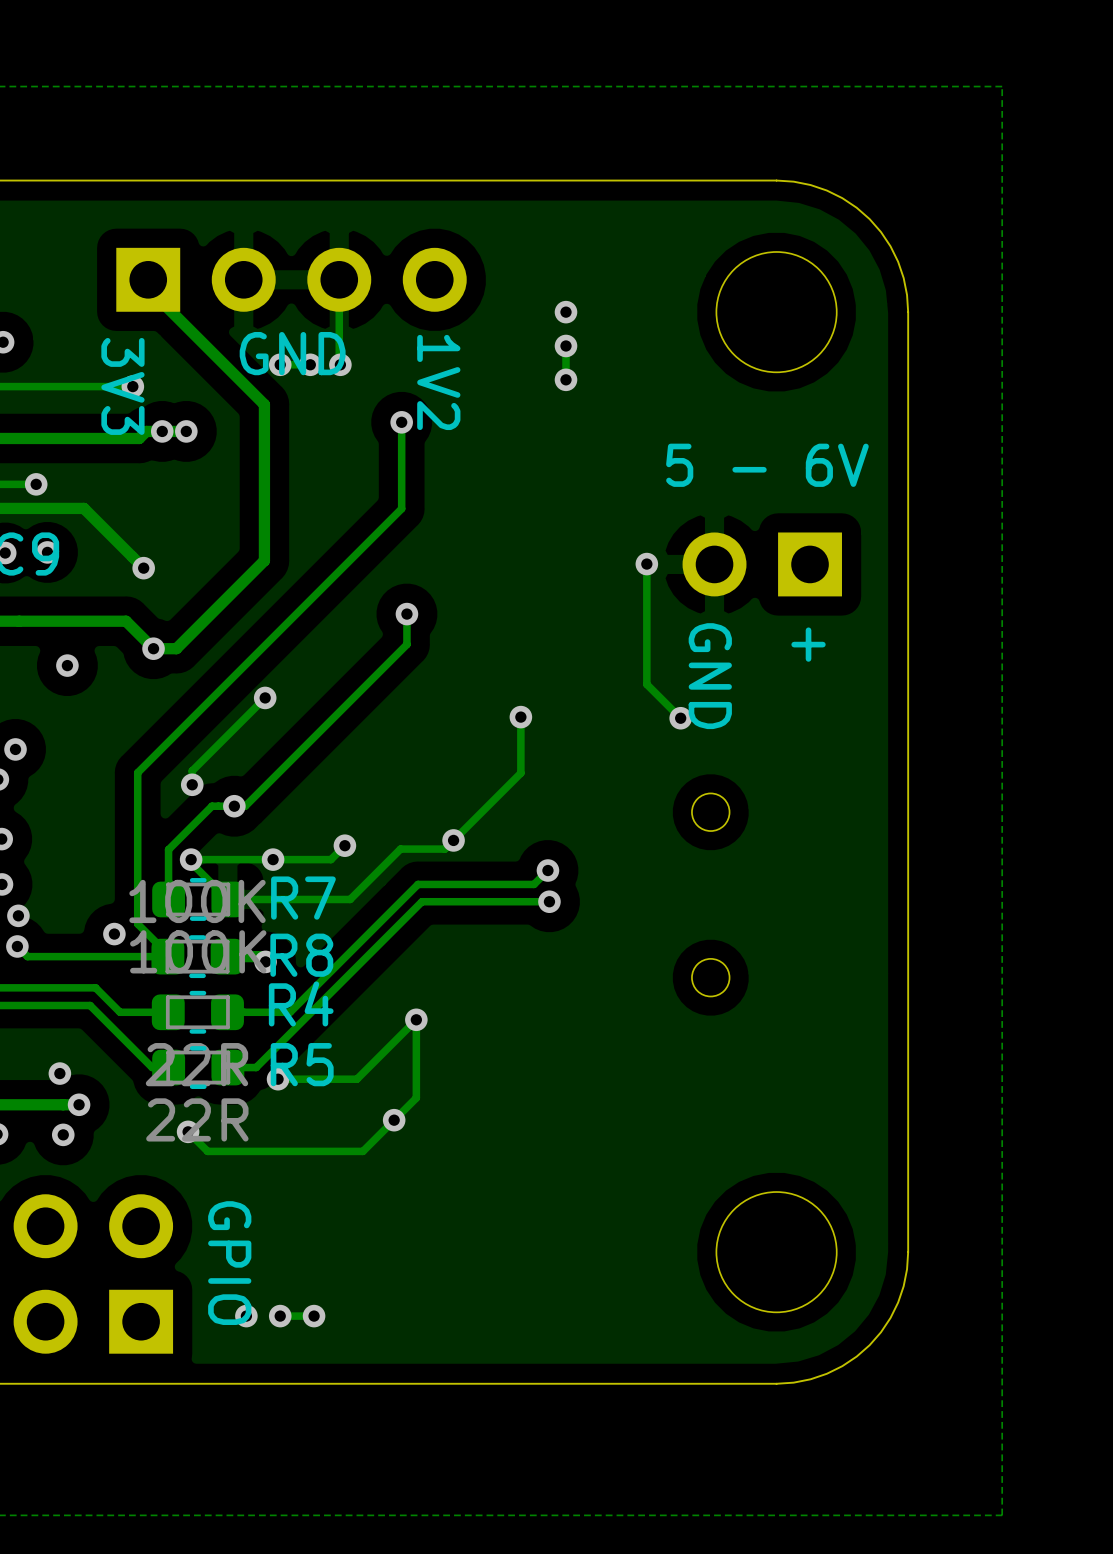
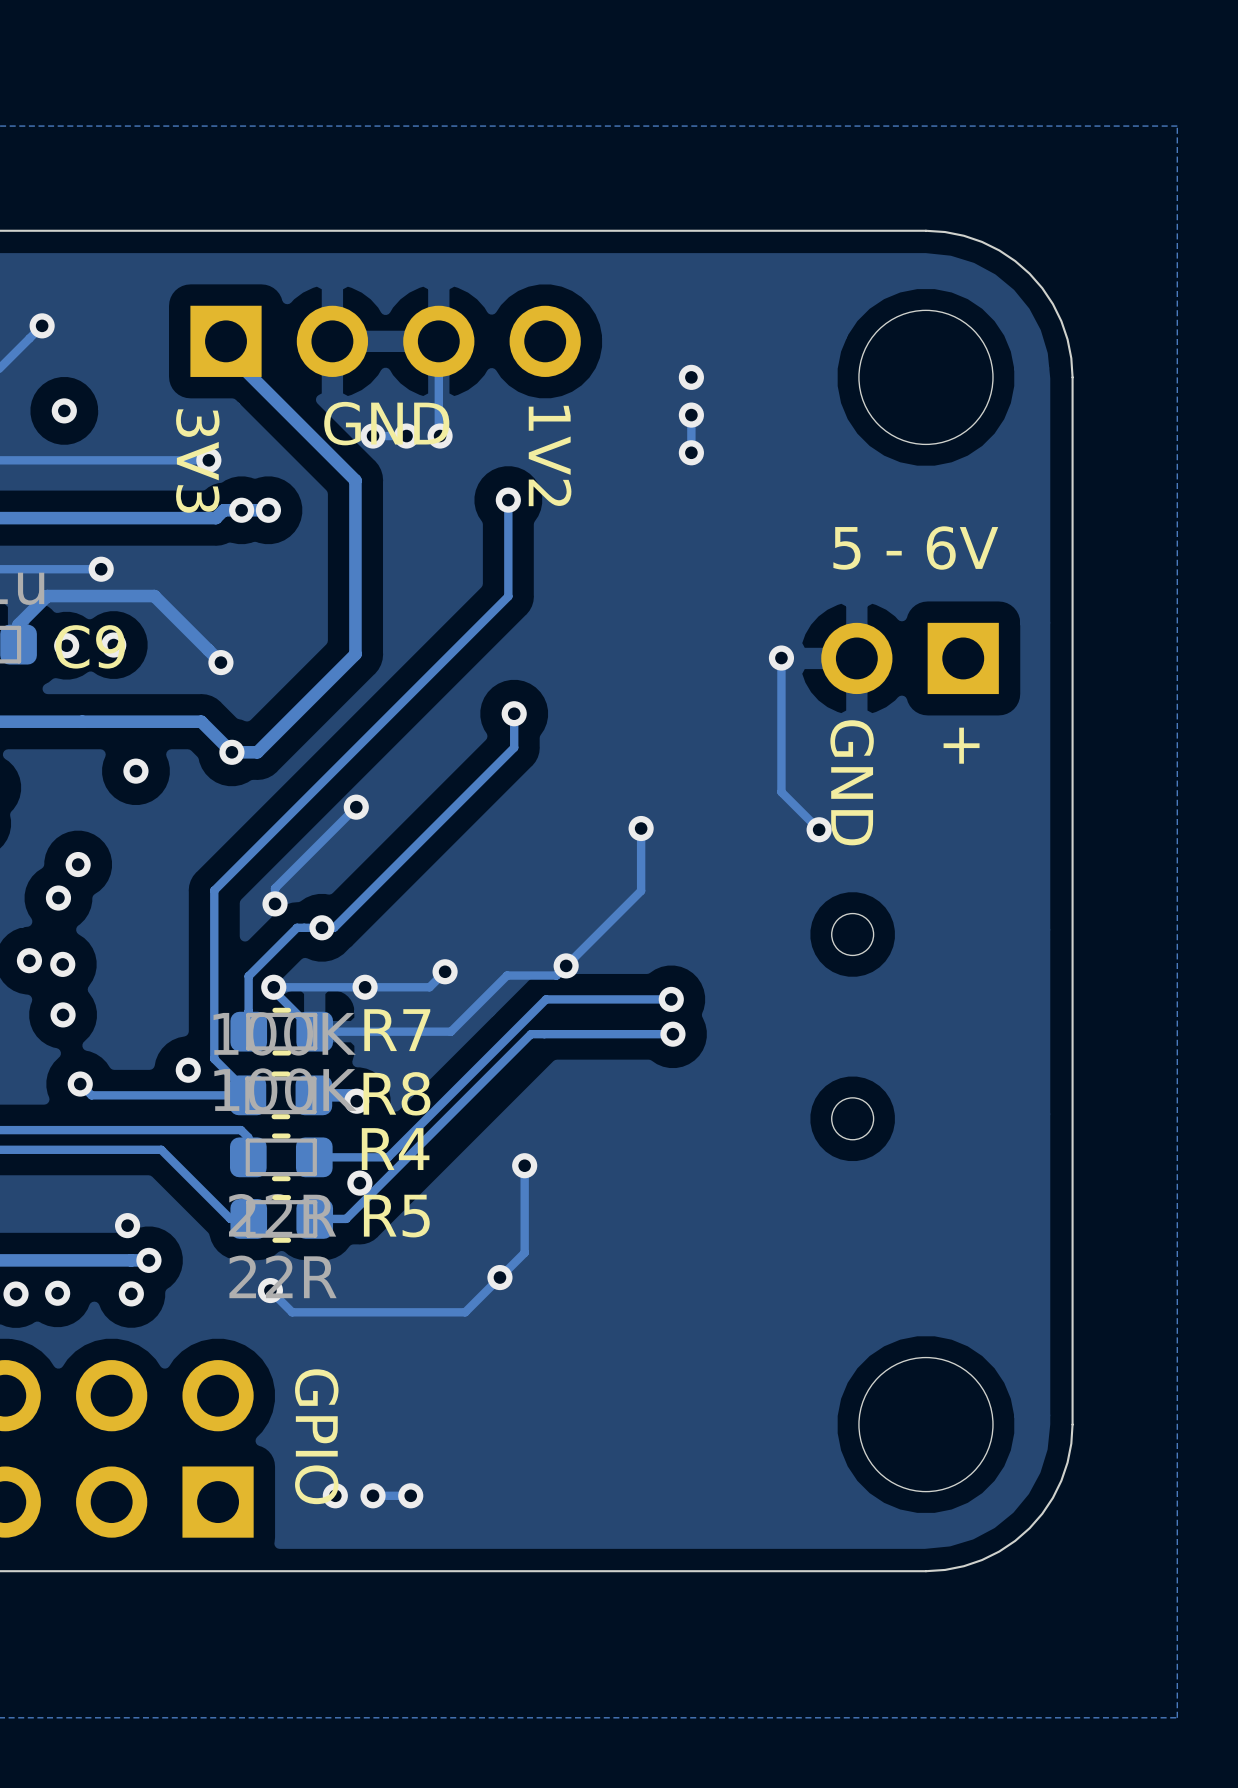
track: (547, 870) (534, 884) (418, 884) (290, 1012) -> (671, 999) (546, 999) (388, 1157) (384, 1157)
via: (18, 915) -> none
track: (95, 987) (120, 1012) (168, 1012) -> (167, 1130) (240, 1130) (248, 1137) (248, 1157)
track: (416, 1019) (356, 1079) (278, 1079) -> none
via position: (278, 1079) -> (359, 1183)

